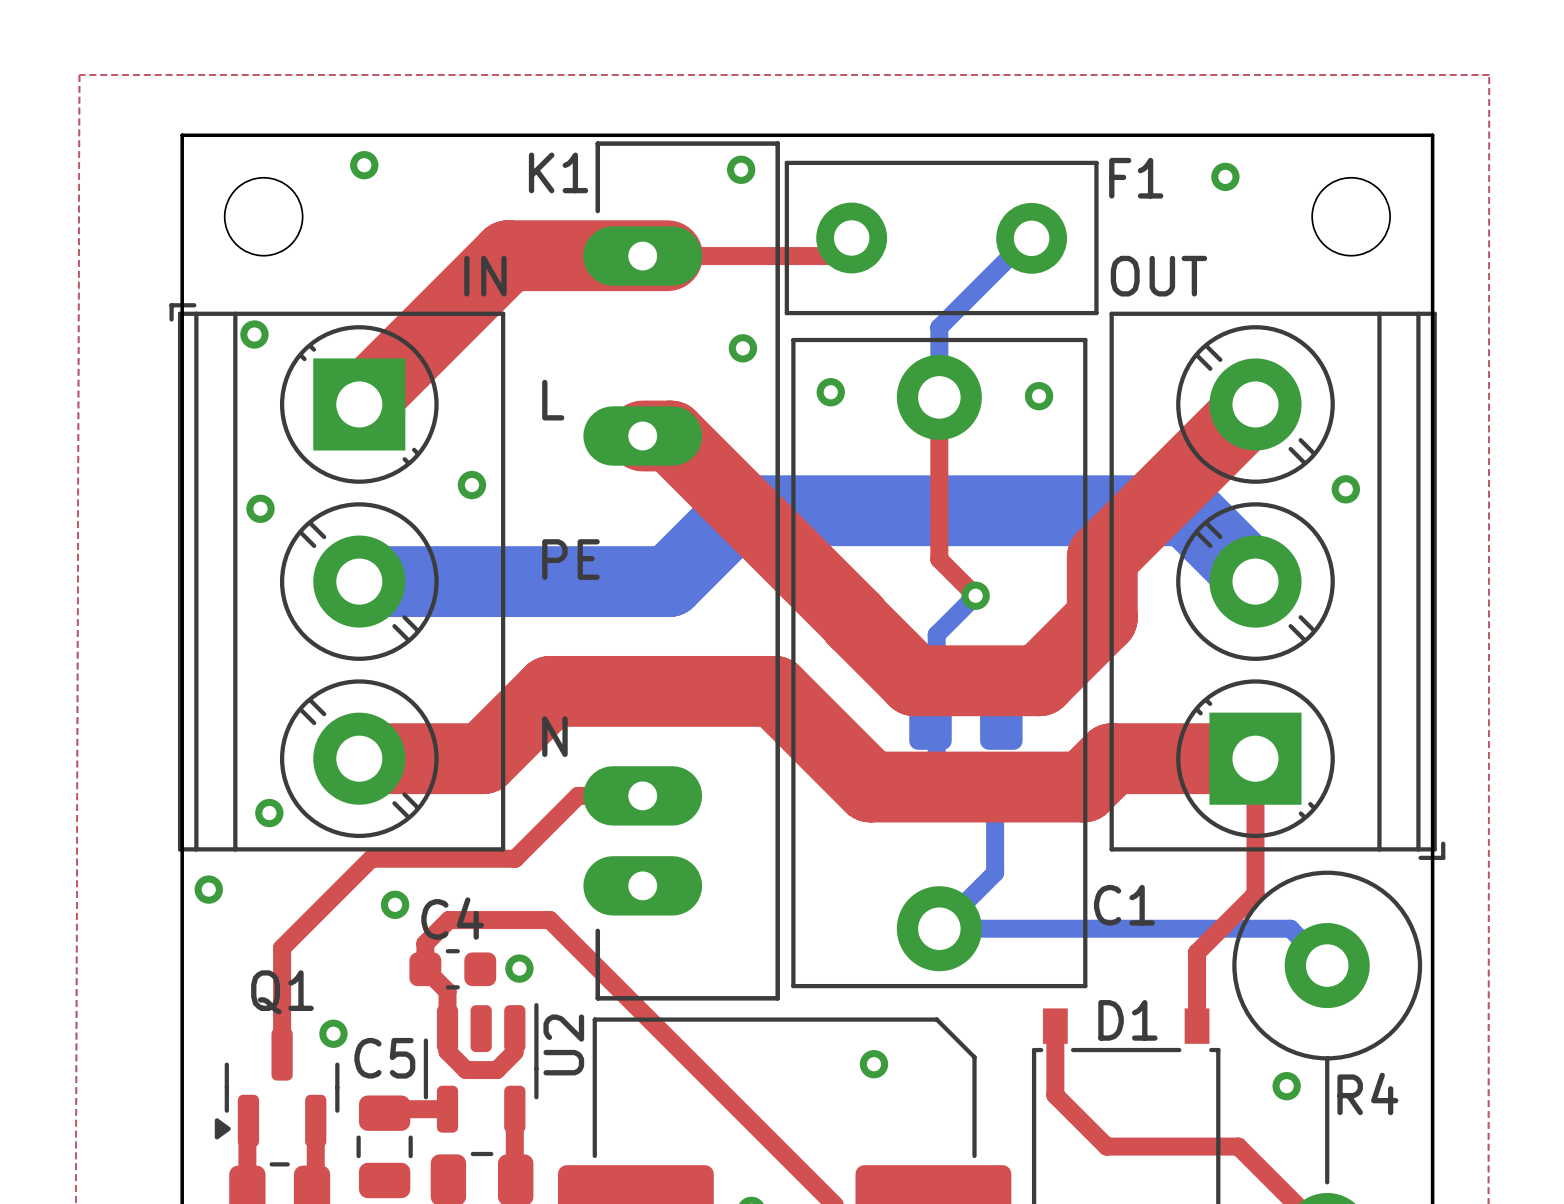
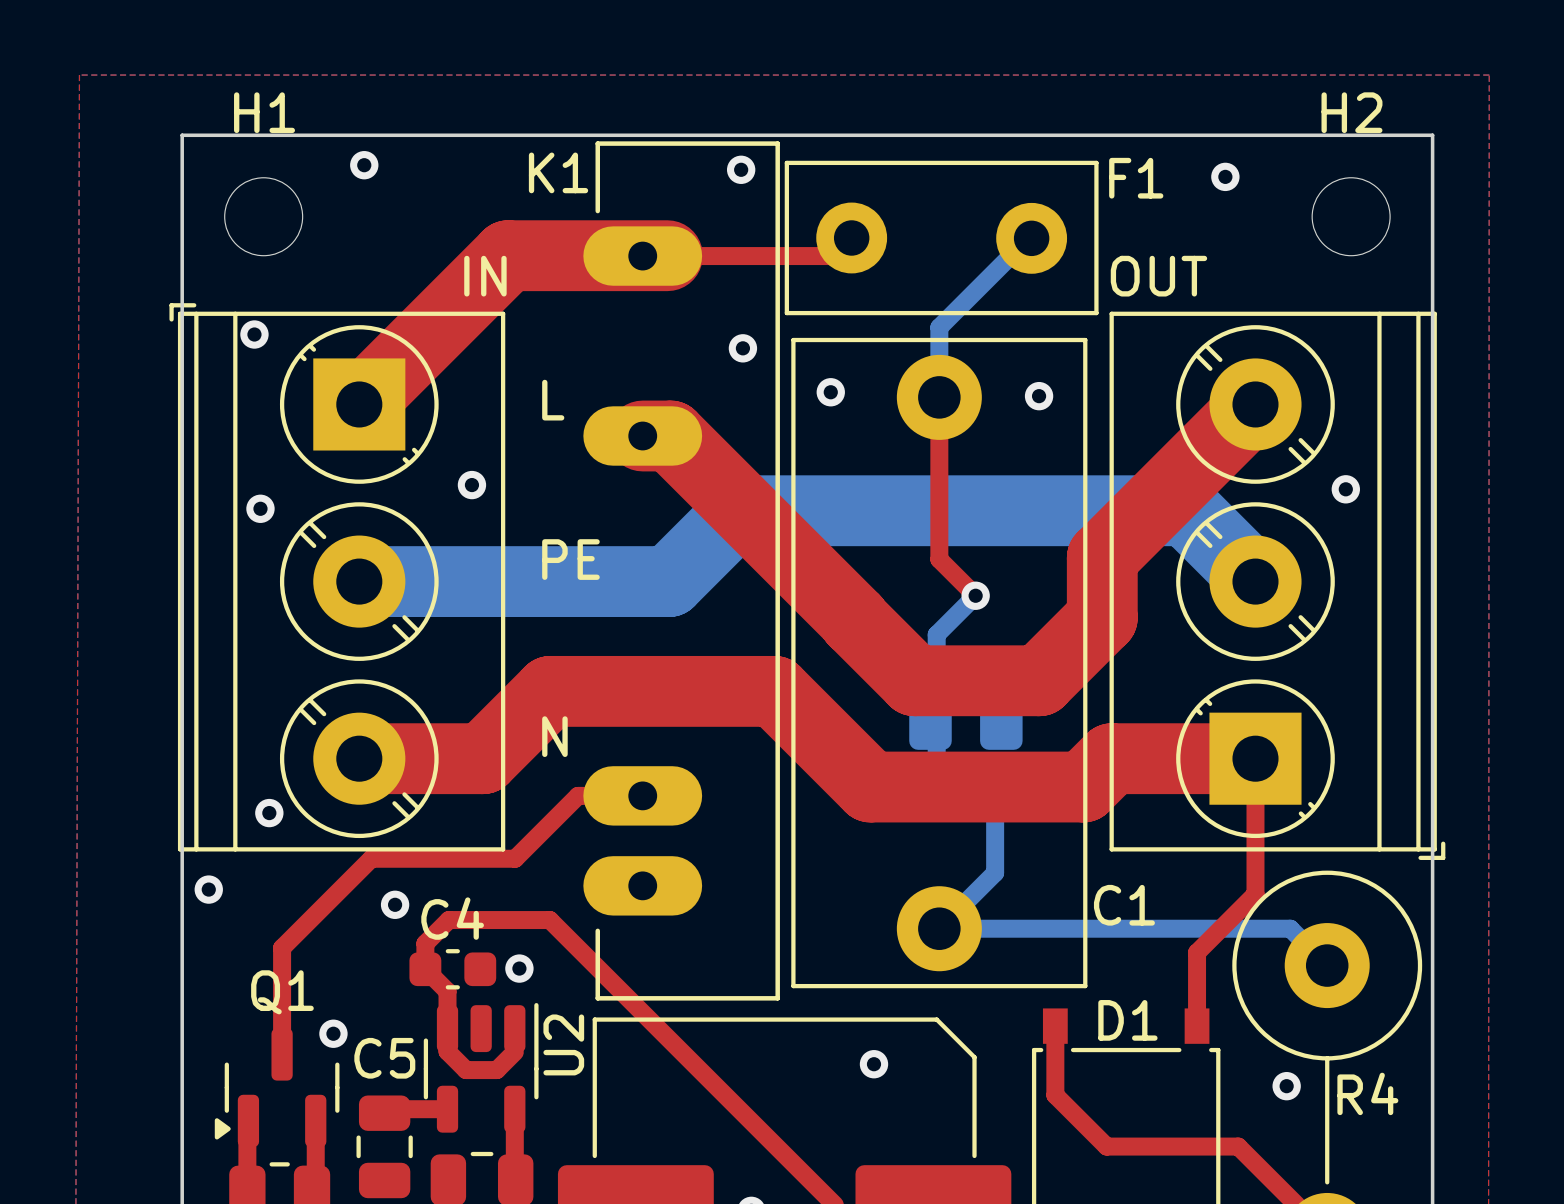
H1 name: none -> H1 (264, 112)
H2 name: none -> H2 (1351, 112)

